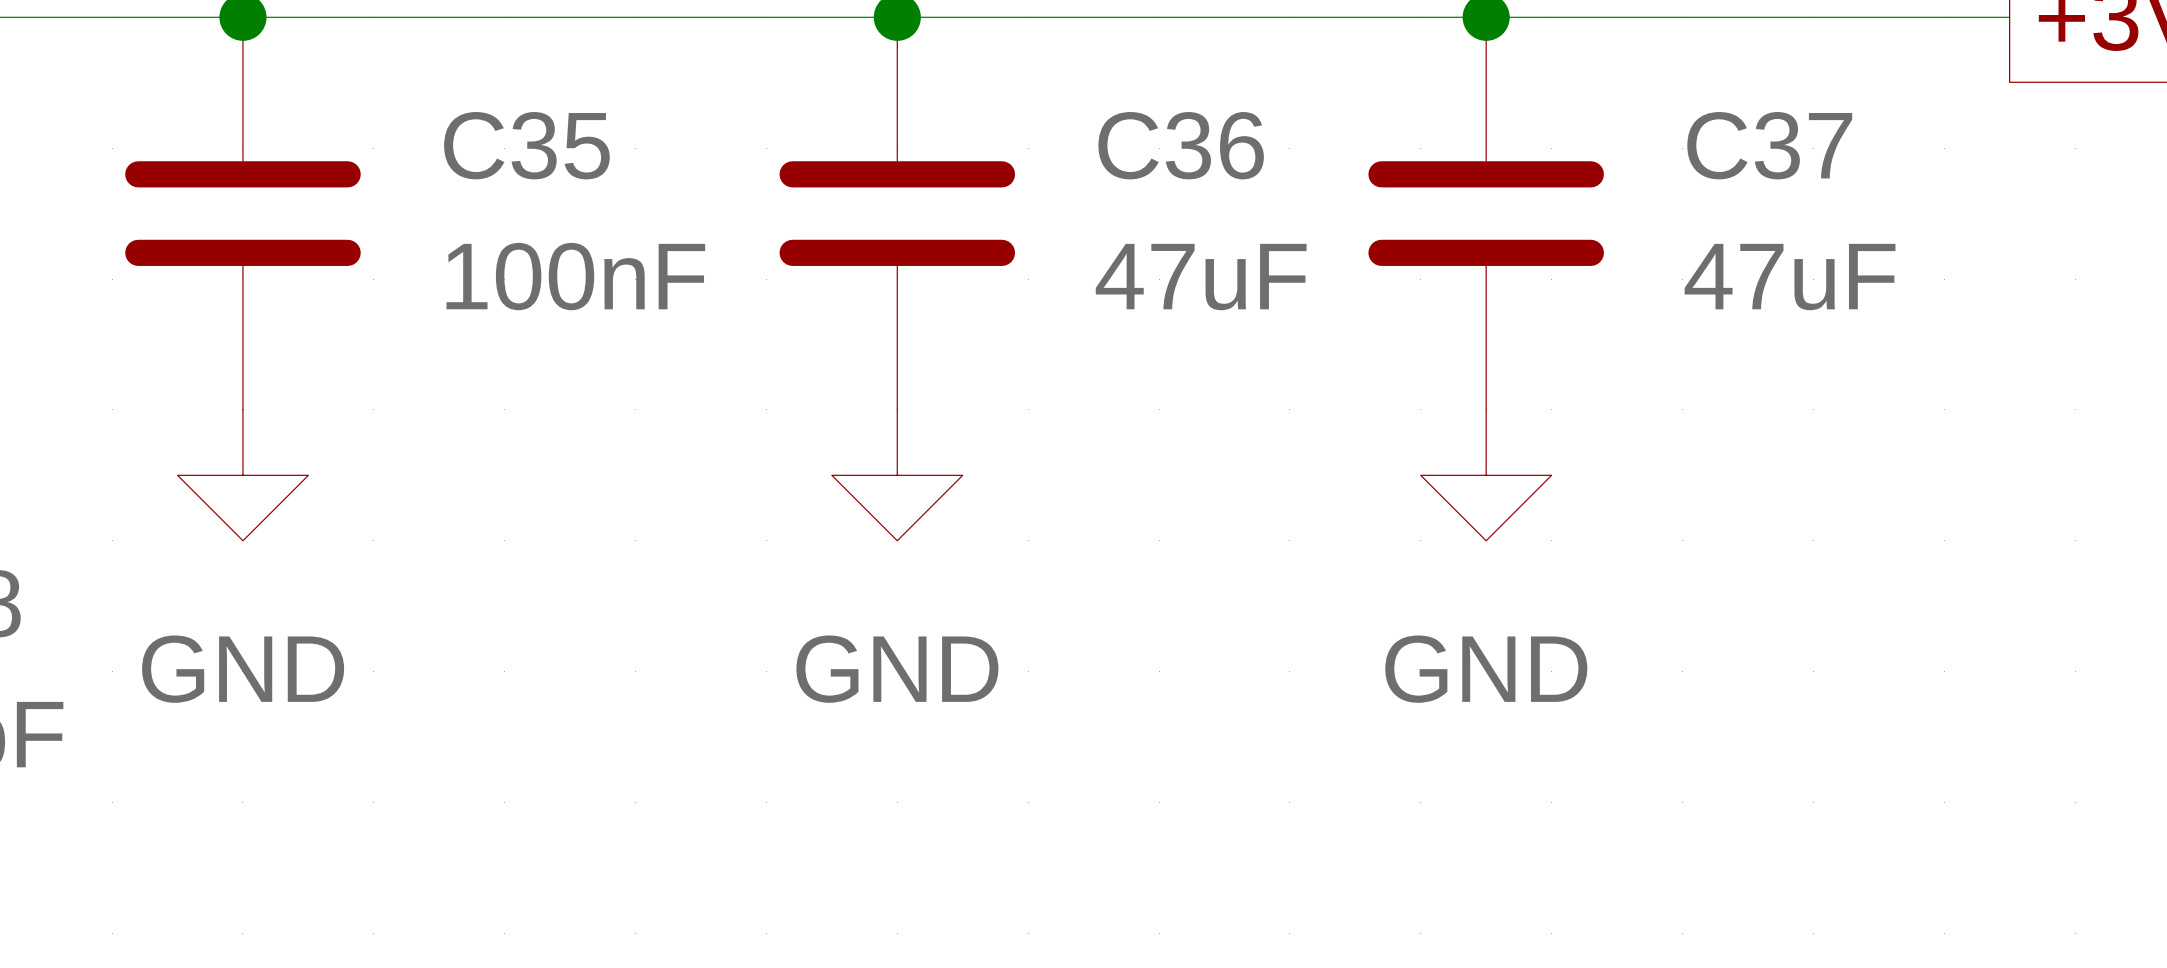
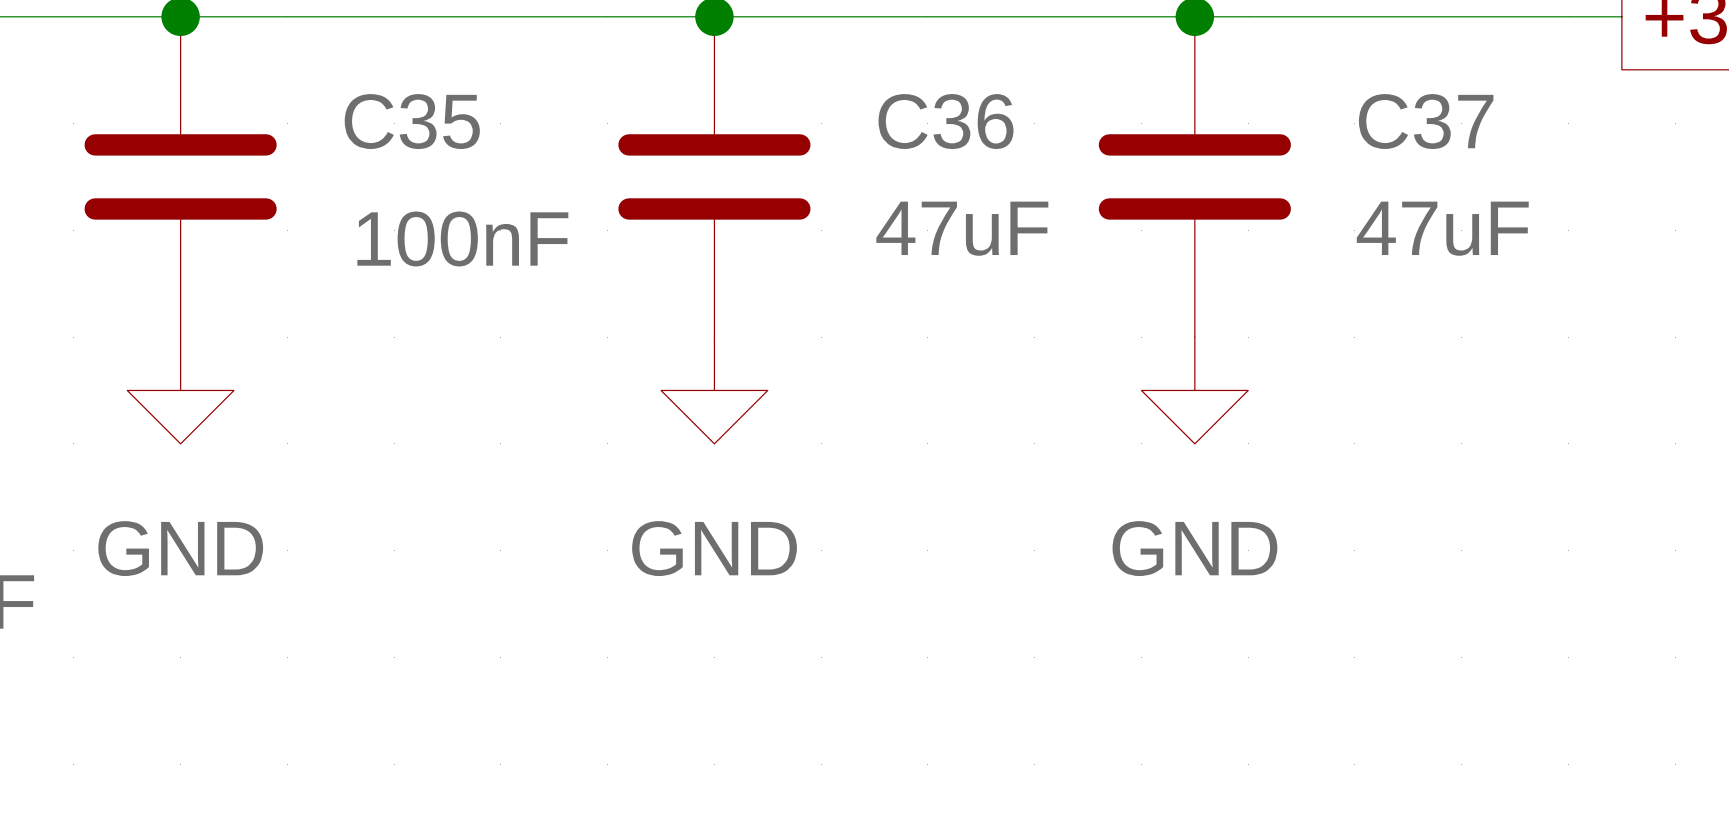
C35 value position: 100nF (575, 276) -> 100nF (462, 238)

